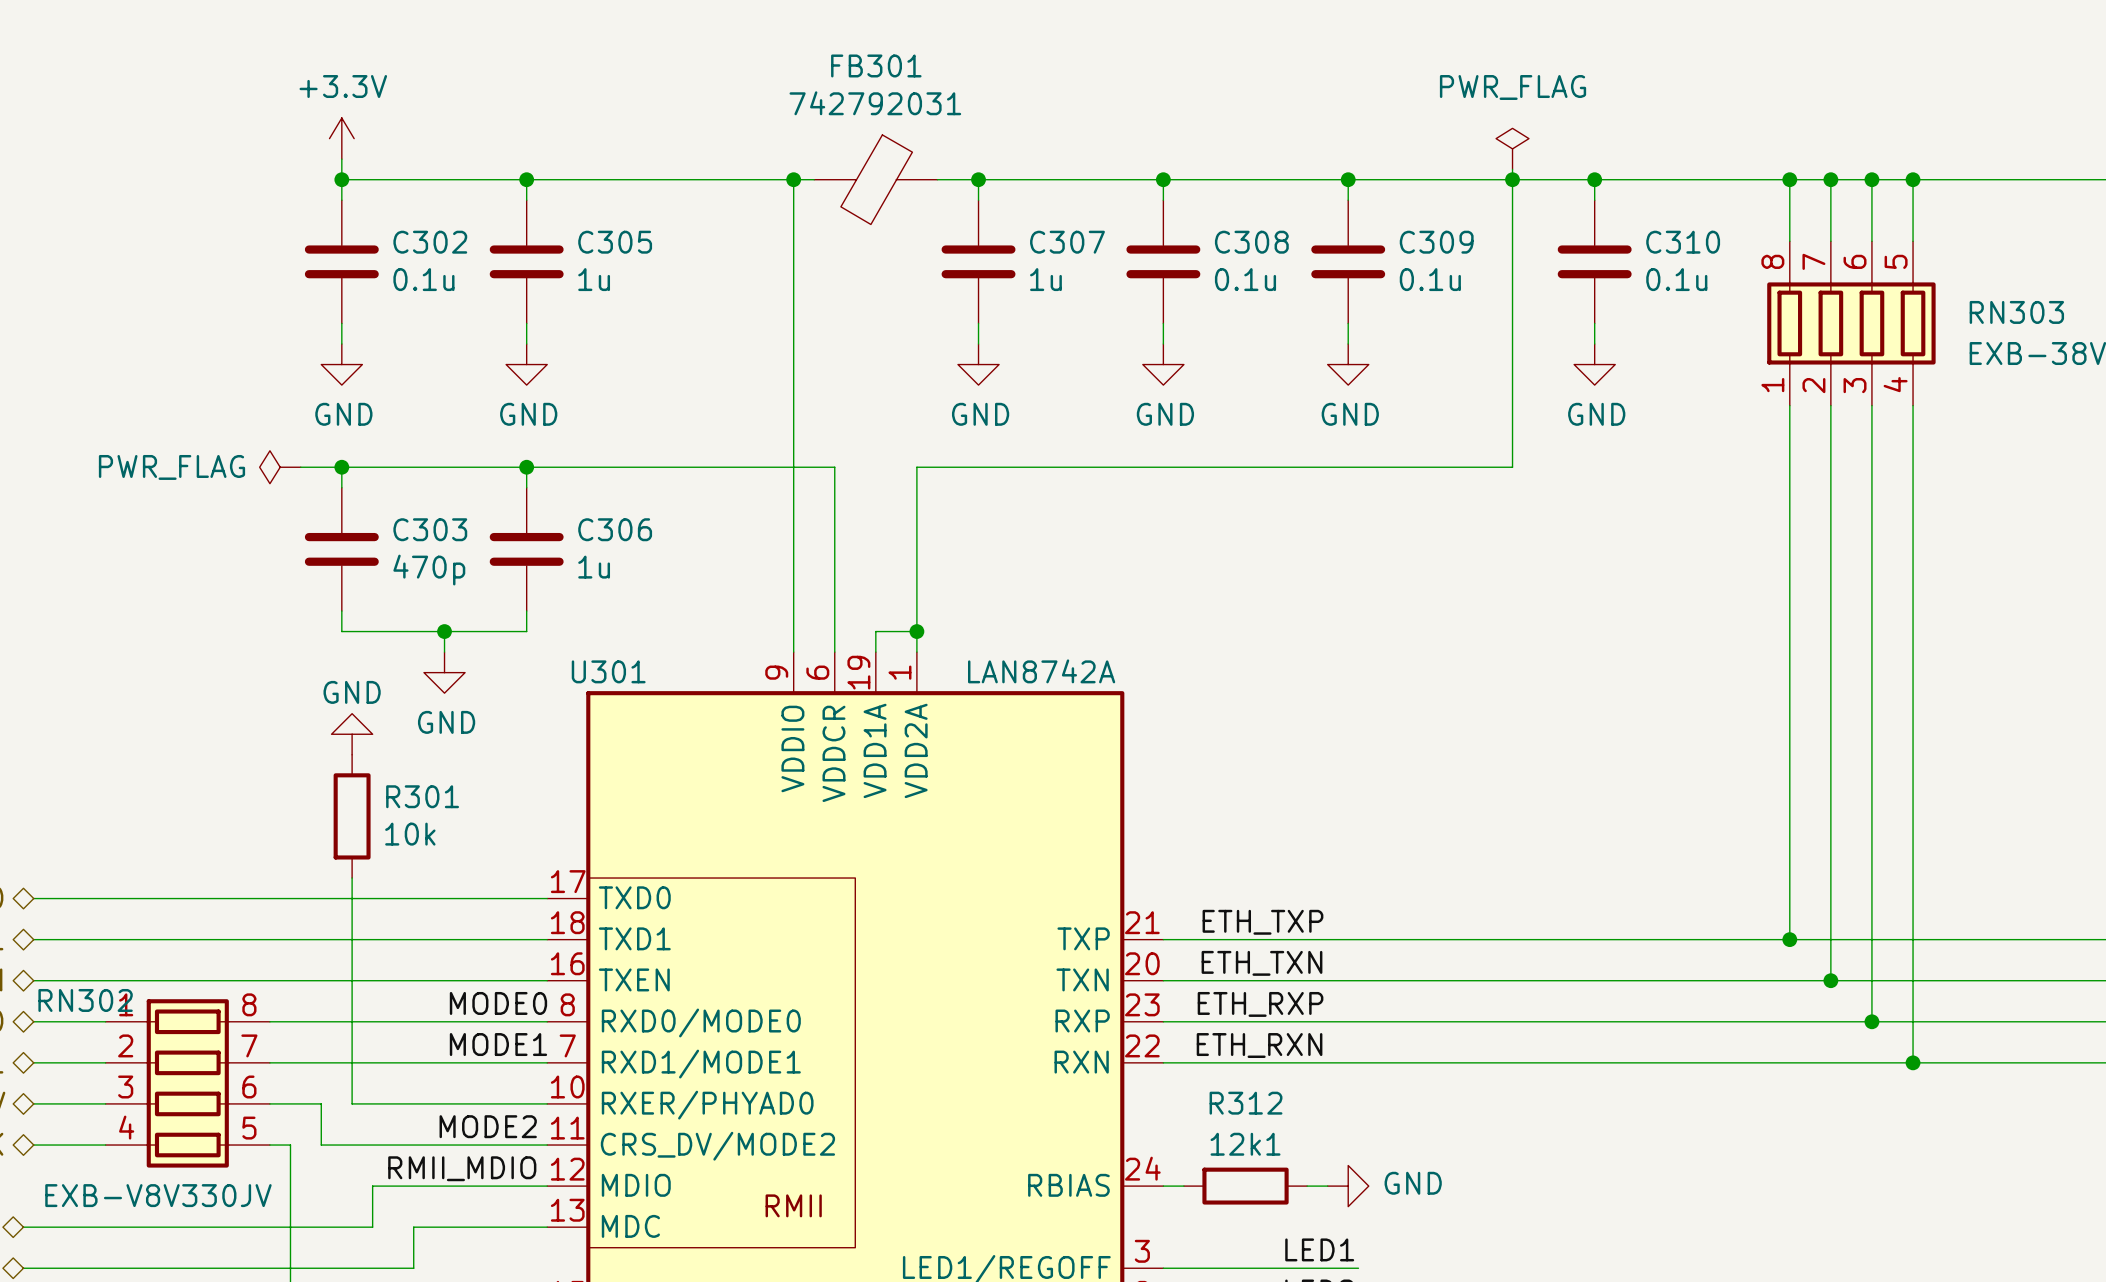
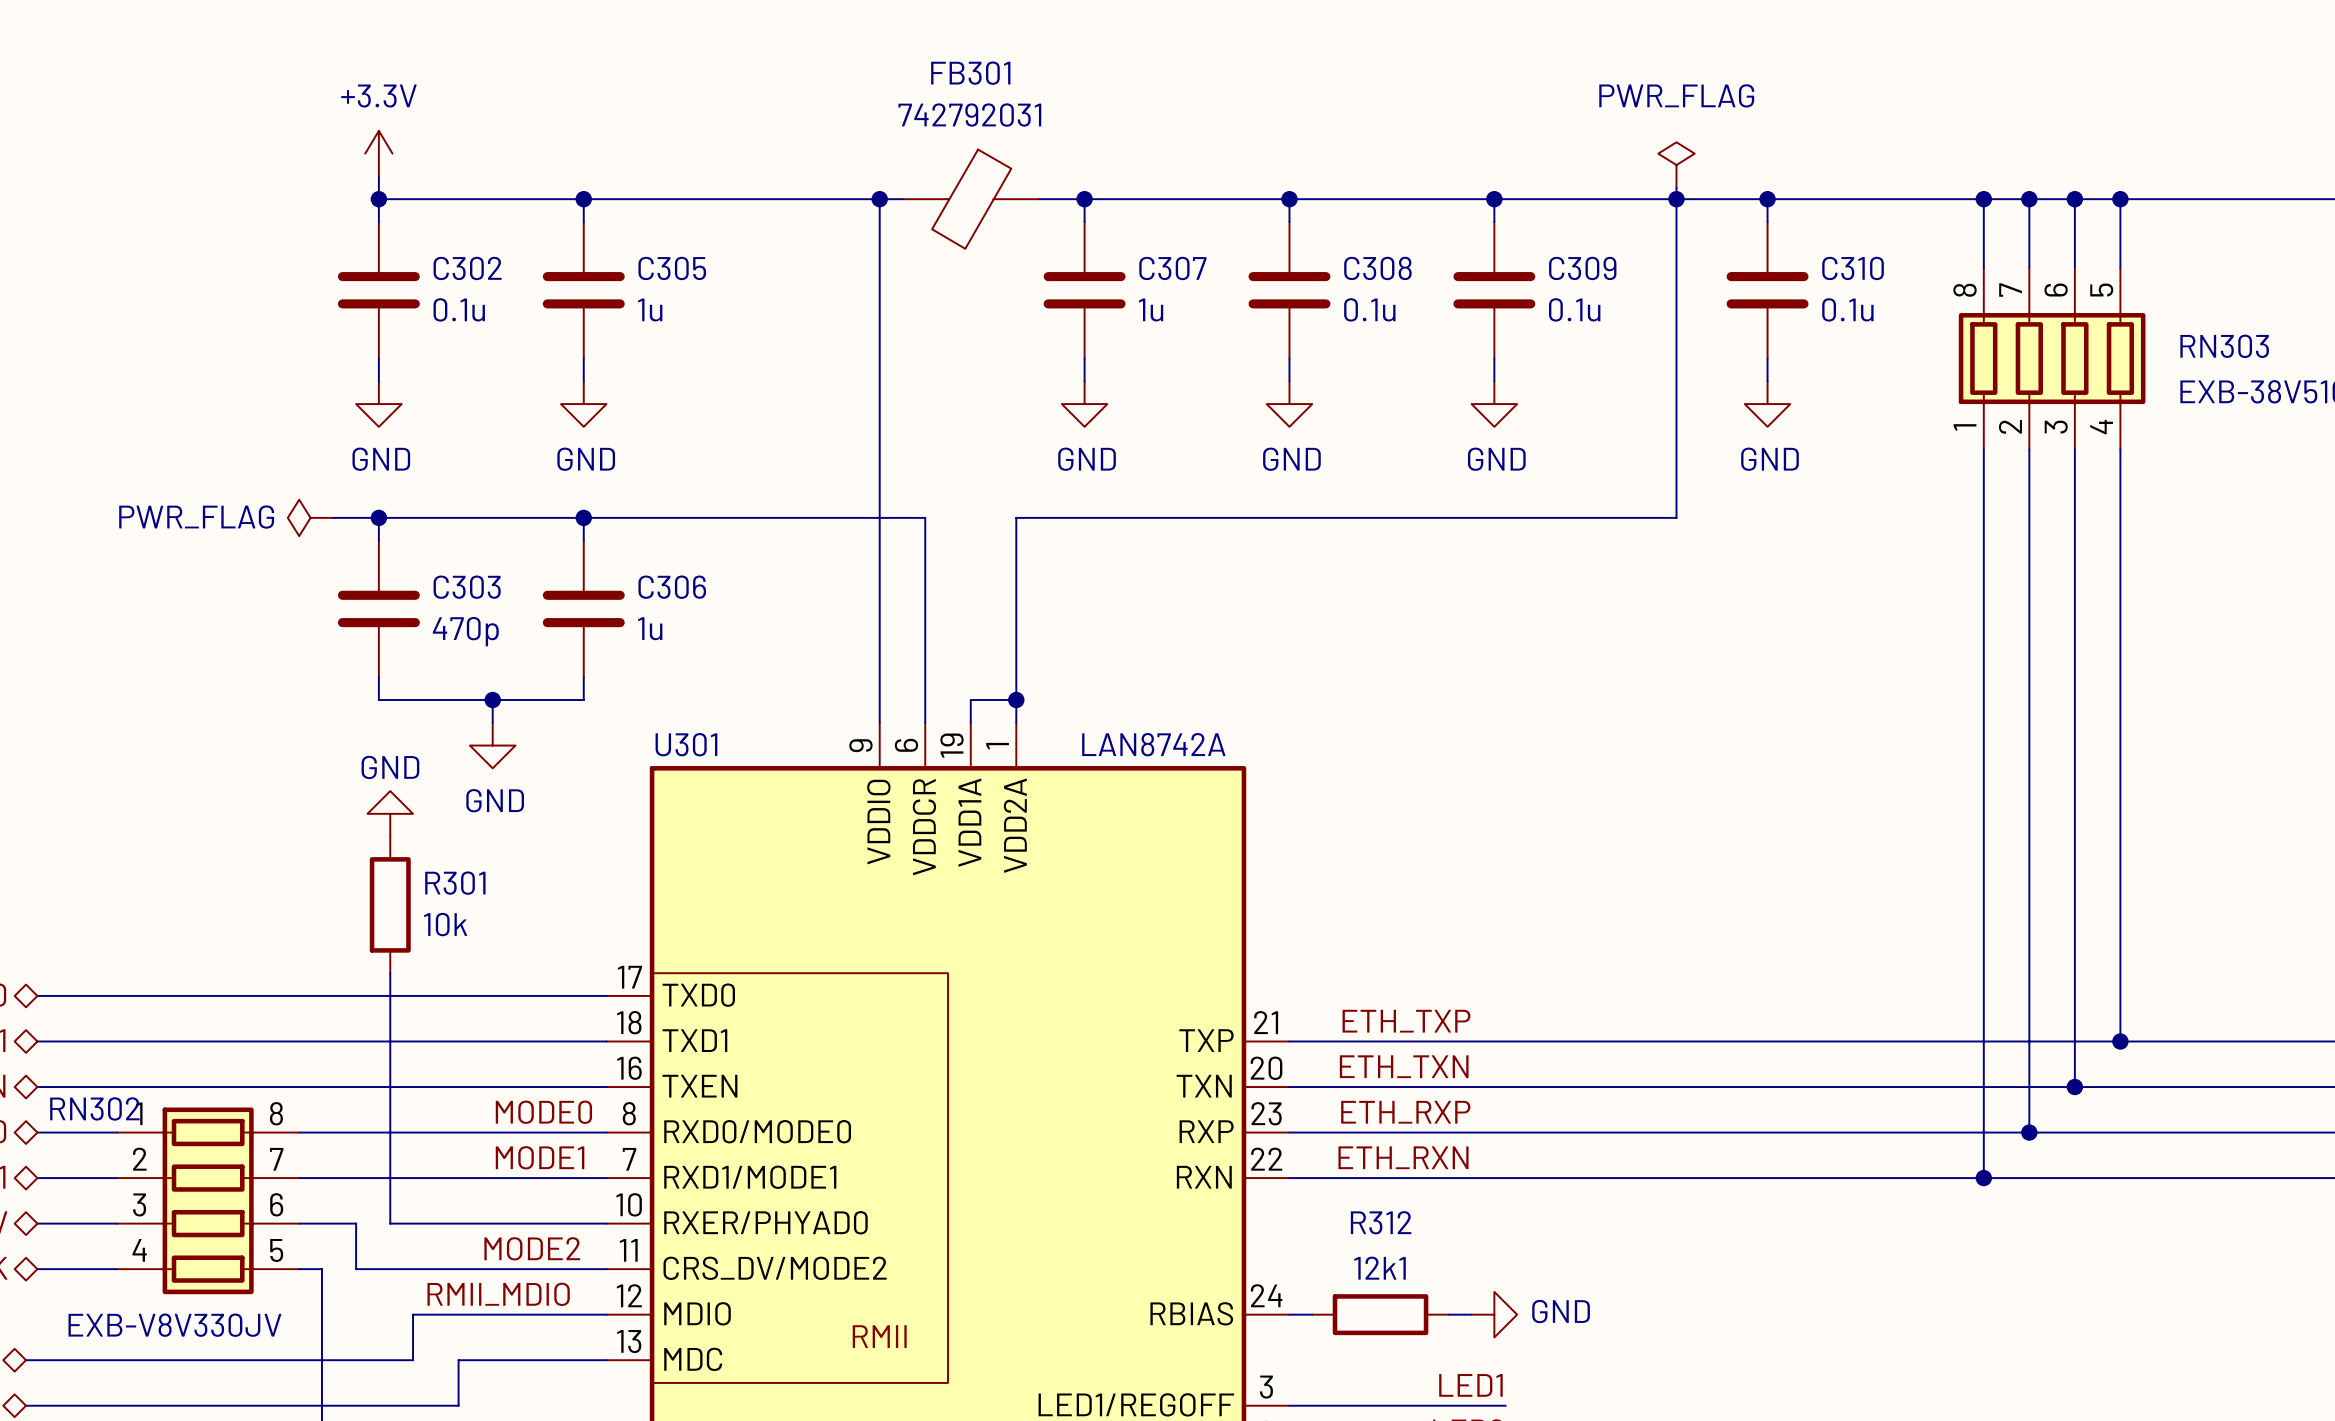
junction: (1789, 939) -> none
wire: (1913, 939) (1913, 1062) -> (1983, 1041) (1983, 1178)
junction: none -> (2120, 1041)
junction: (1830, 980) -> none
wire: (1871, 980) (1871, 1021) -> (2029, 1087) (2029, 1132)
junction: none -> (2074, 1087)
junction: none -> (2029, 1132)
junction: (1871, 1021) -> none
junction: none -> (1983, 1178)
junction: (1913, 1062) -> none

